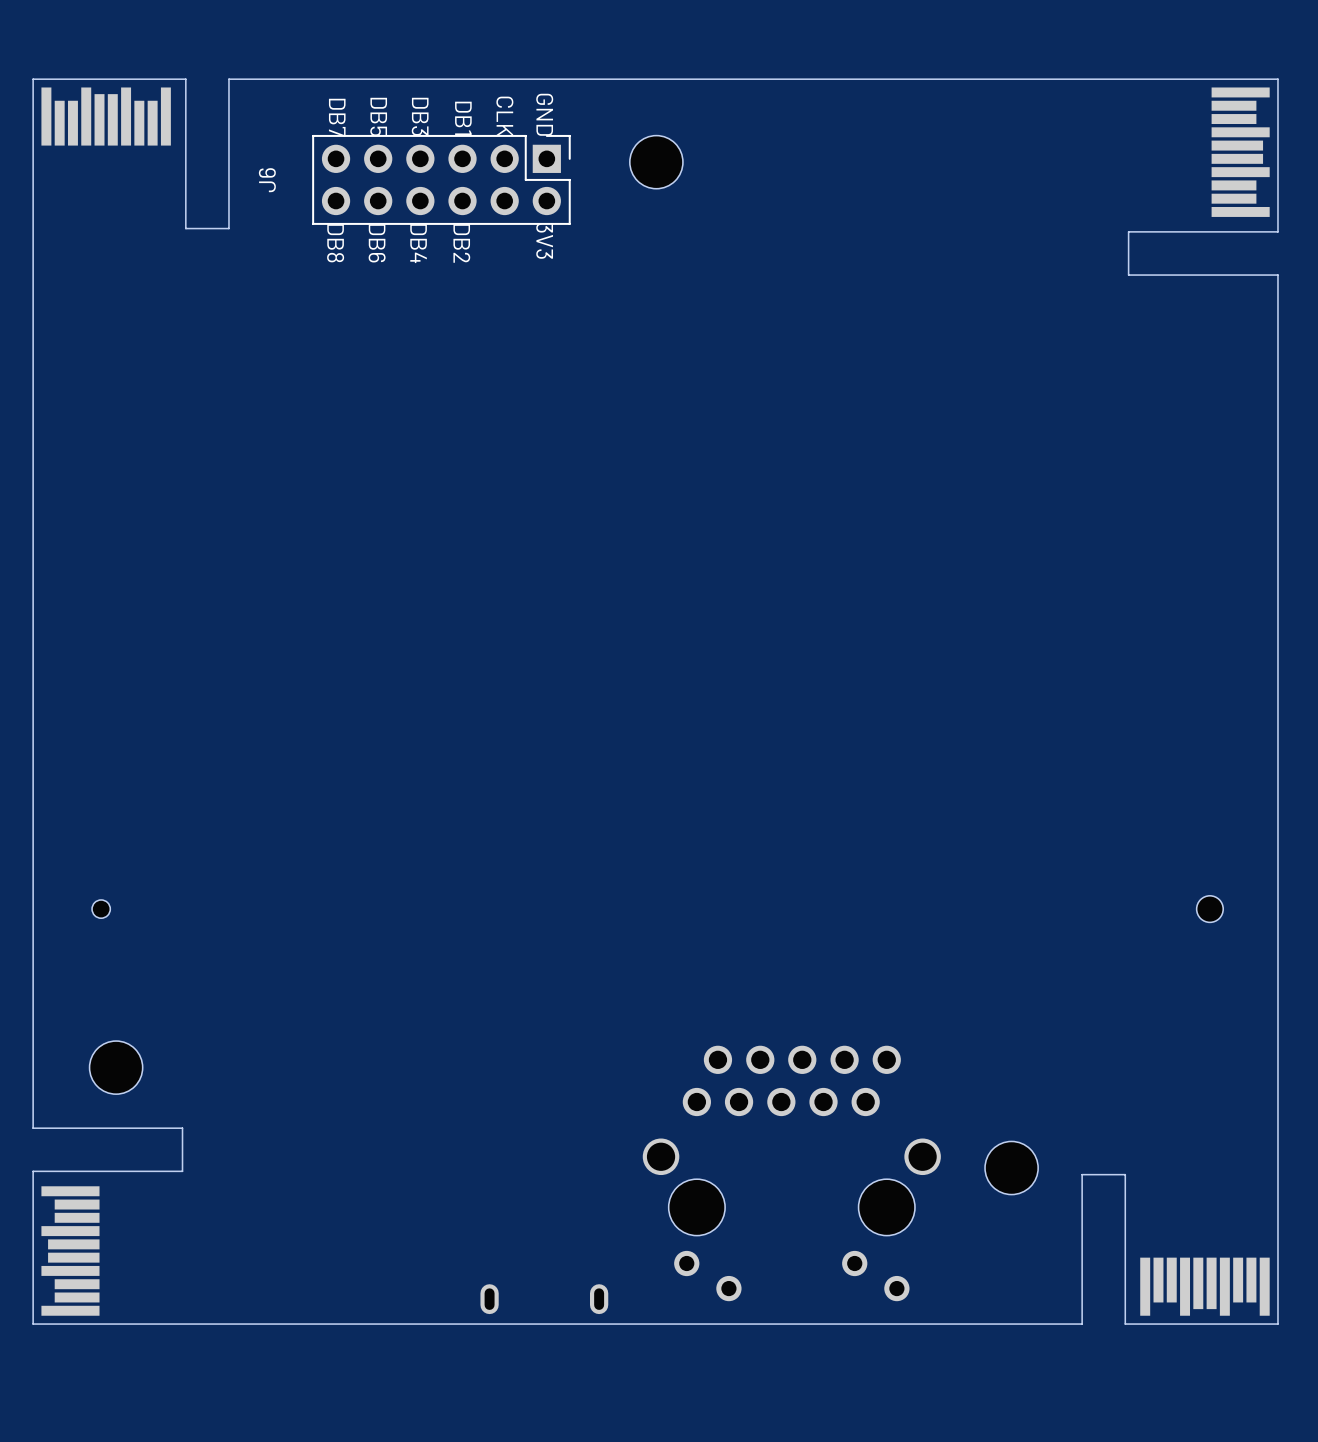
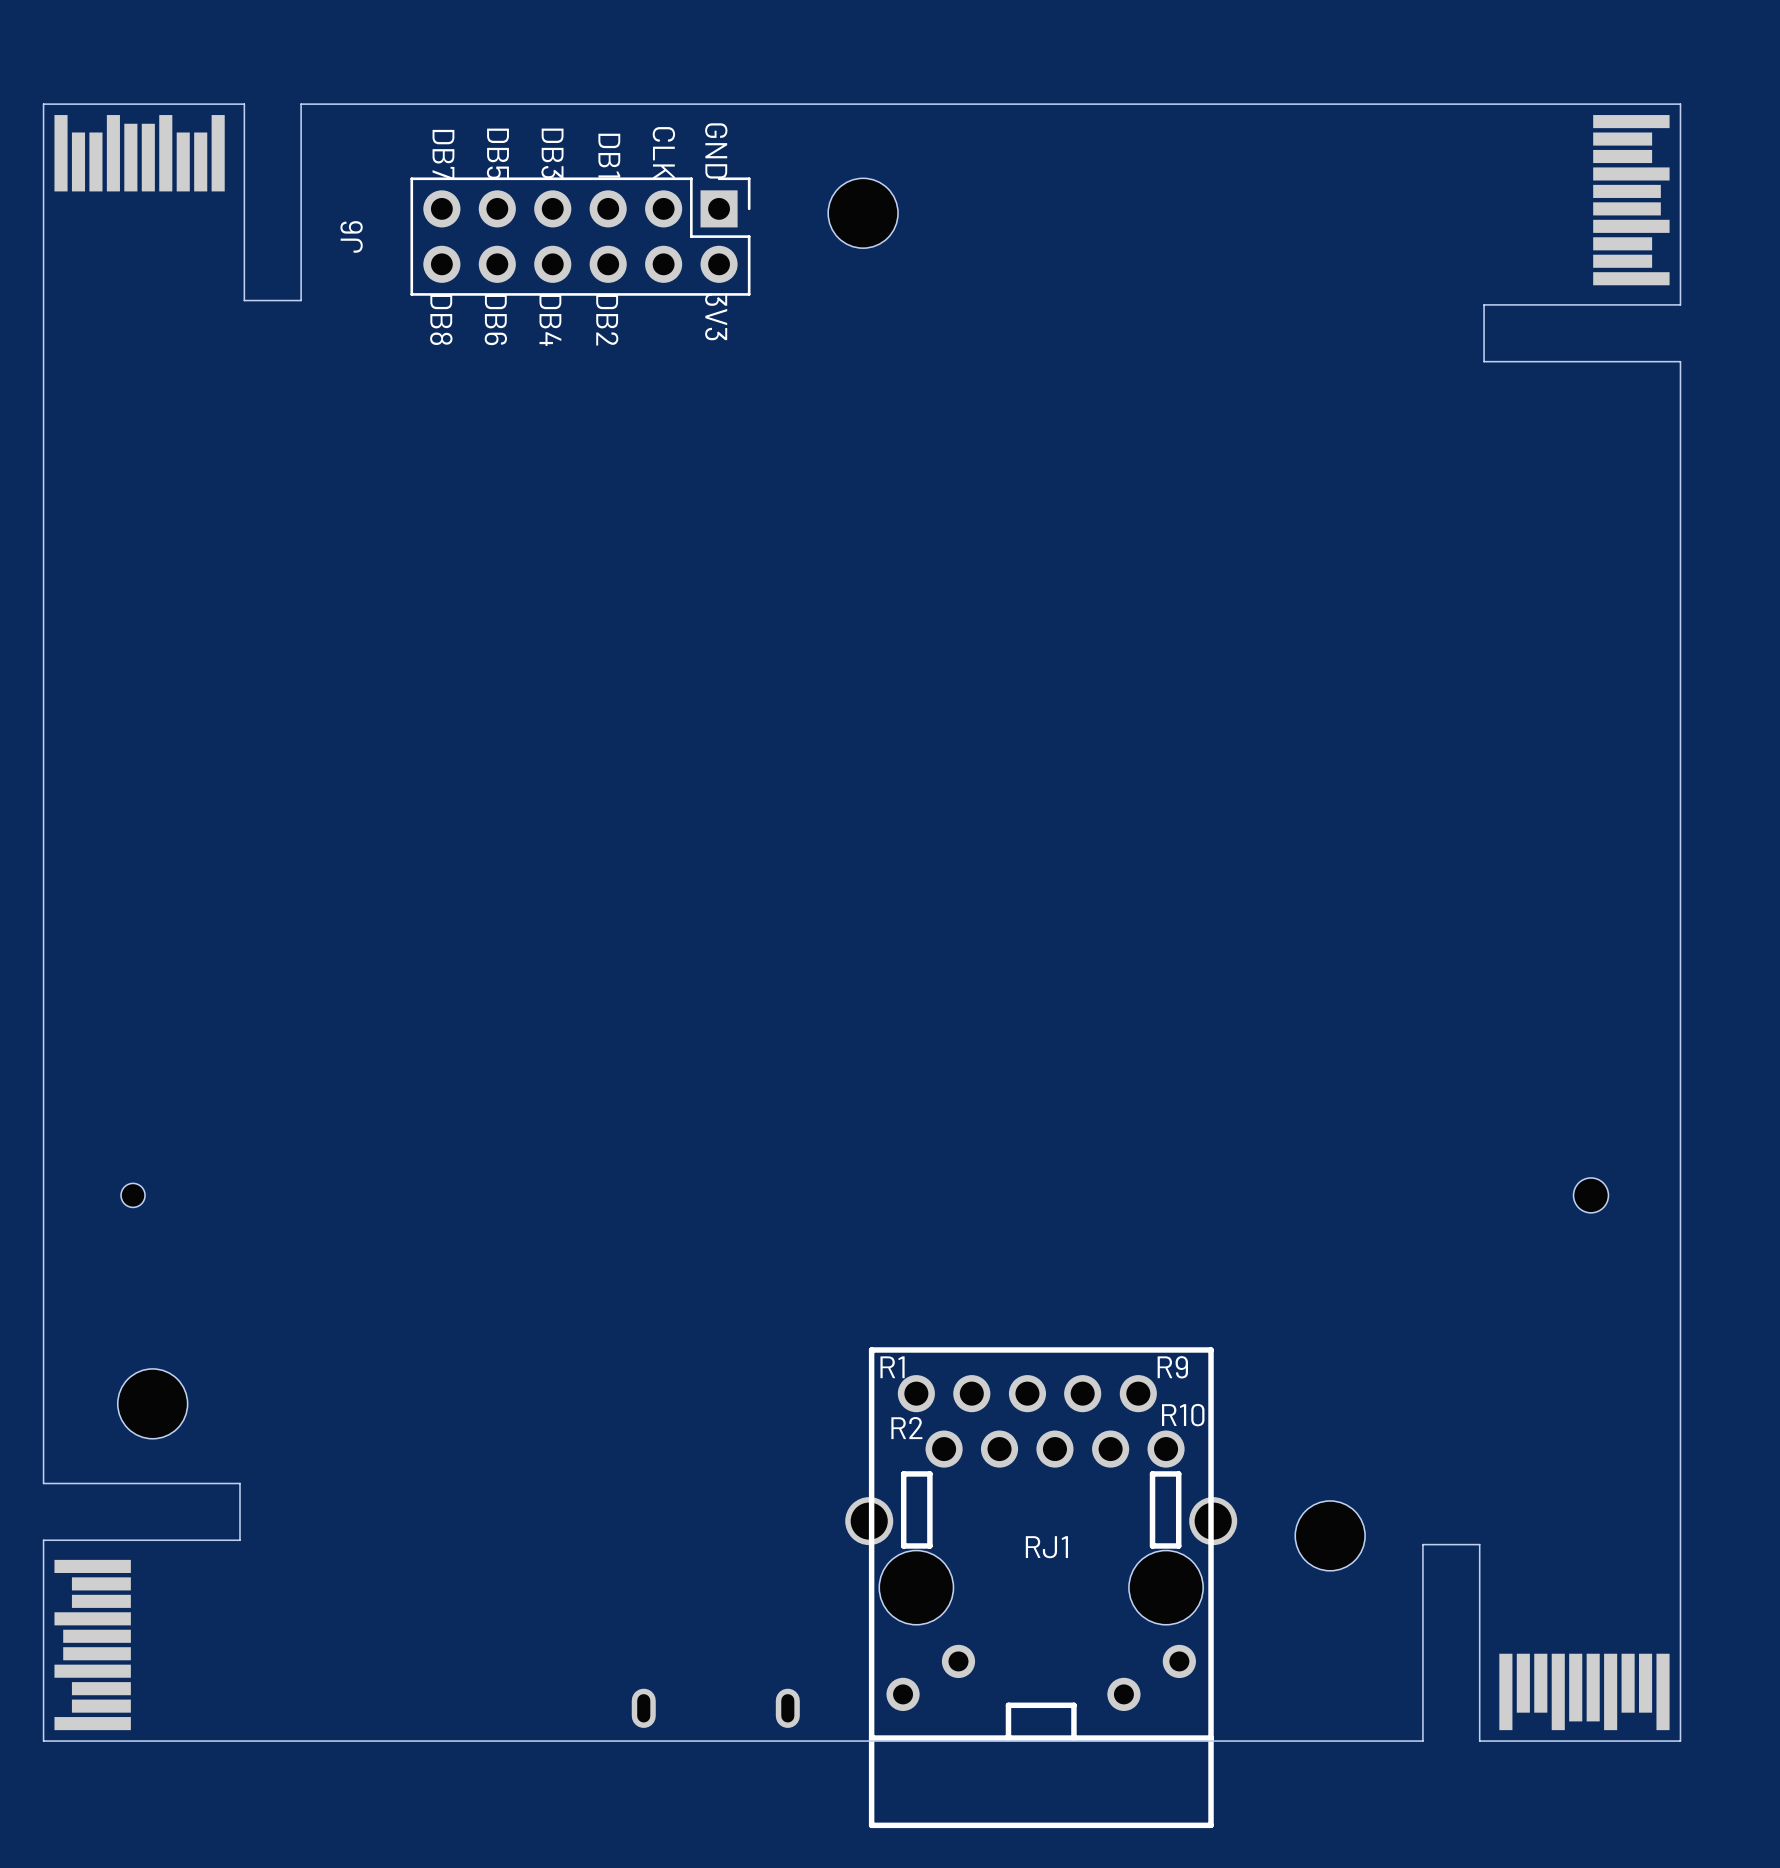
RJ1 side: bottom (791, 1173) -> top (1041, 1587)

